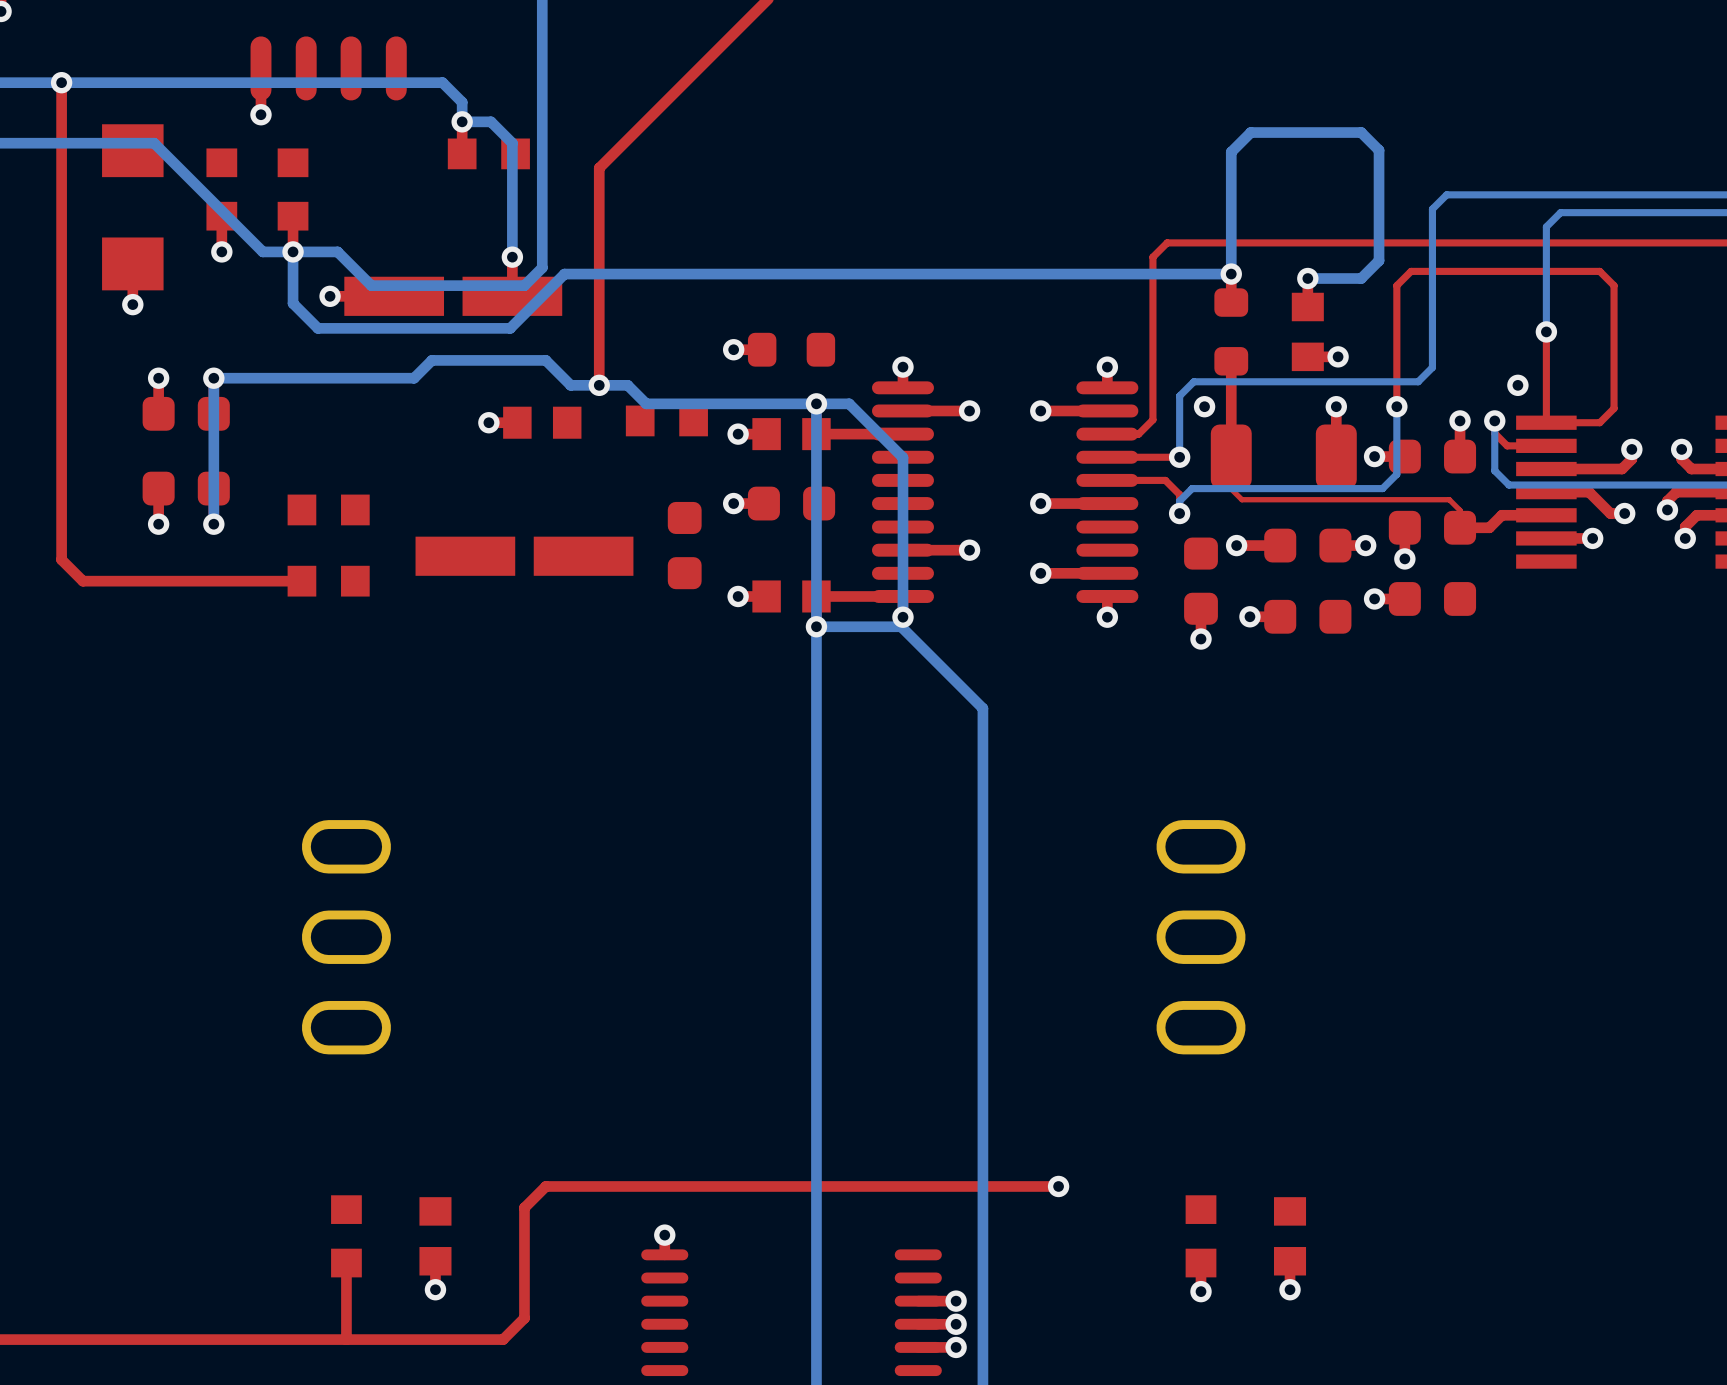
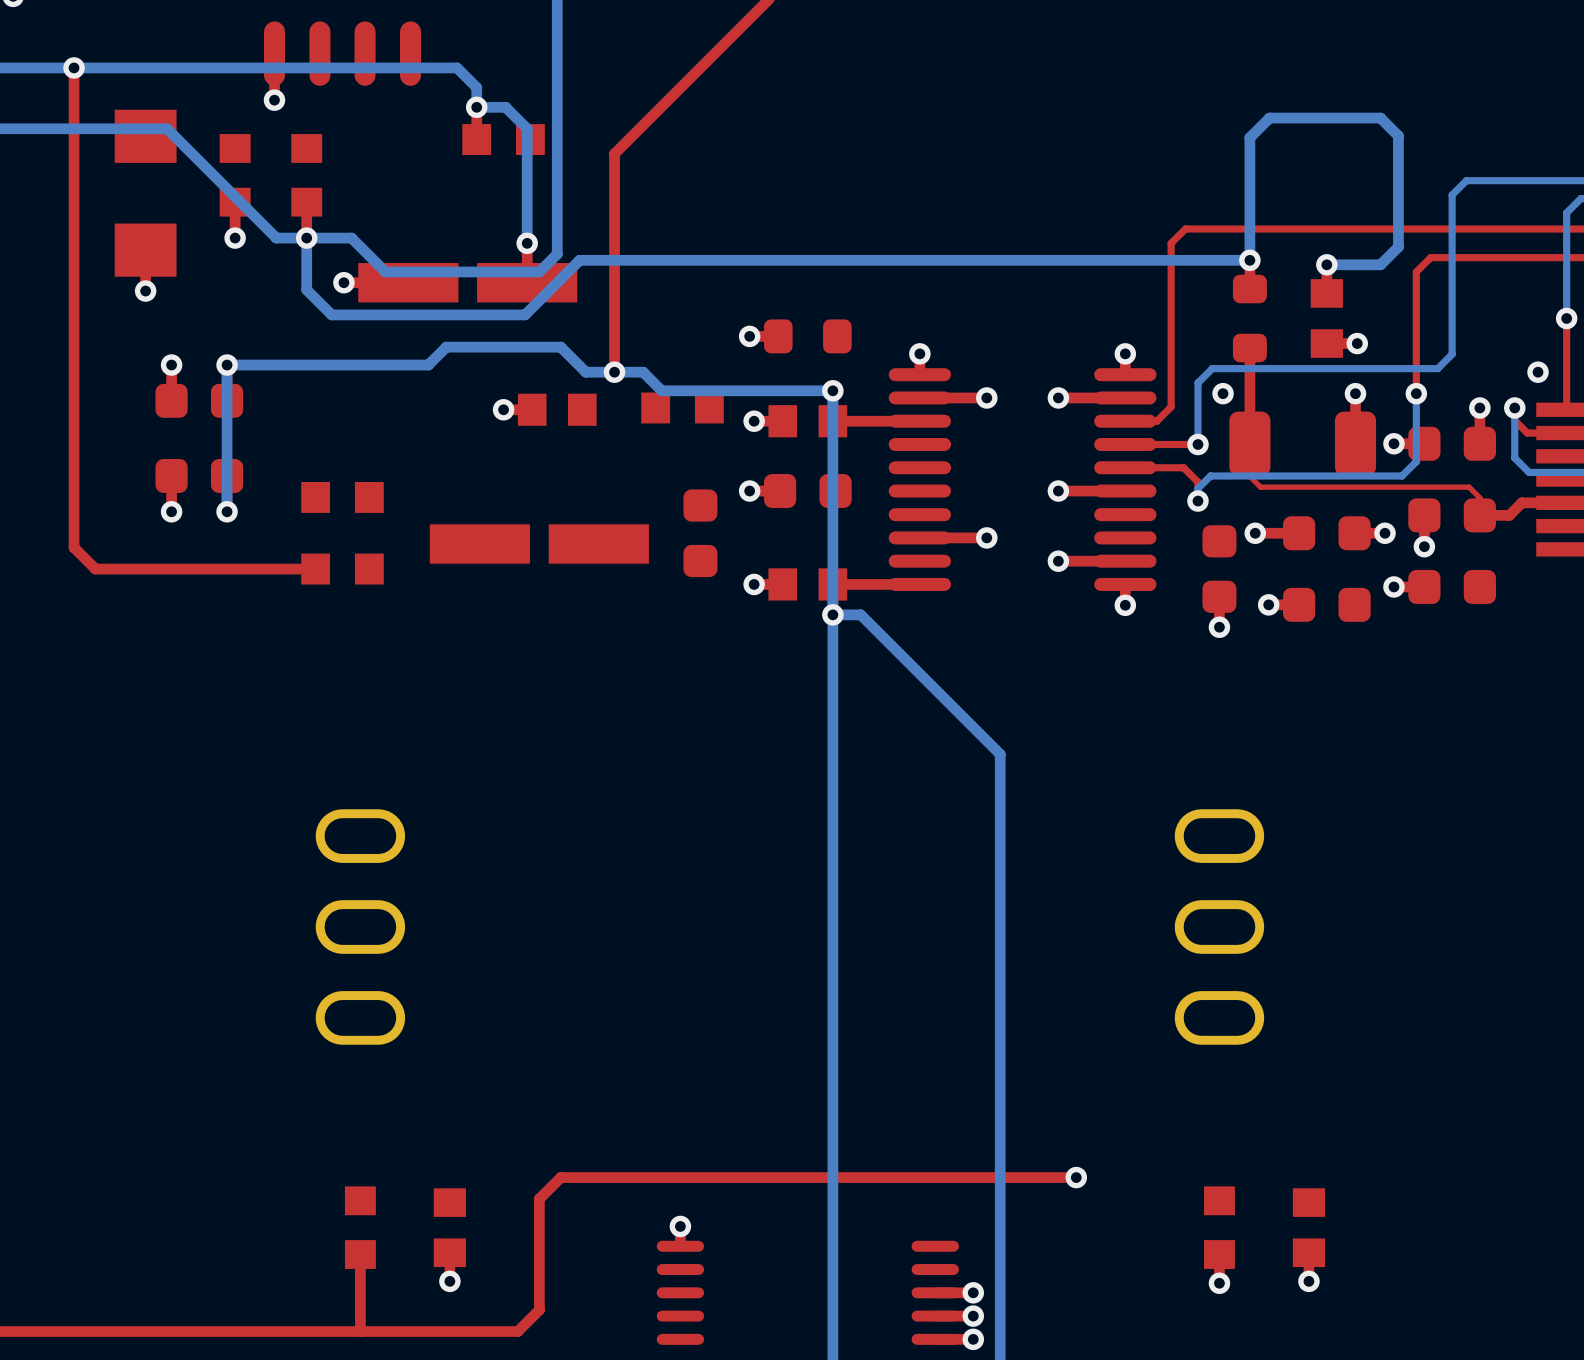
bottom track: (816, 403) (849, 403) (902, 457) (902, 617) -> none
via: (902, 617) -> none
bottom track: (844, 626) (901, 626) (982, 708) (982, 765) -> (860, 614) (1000, 754)

